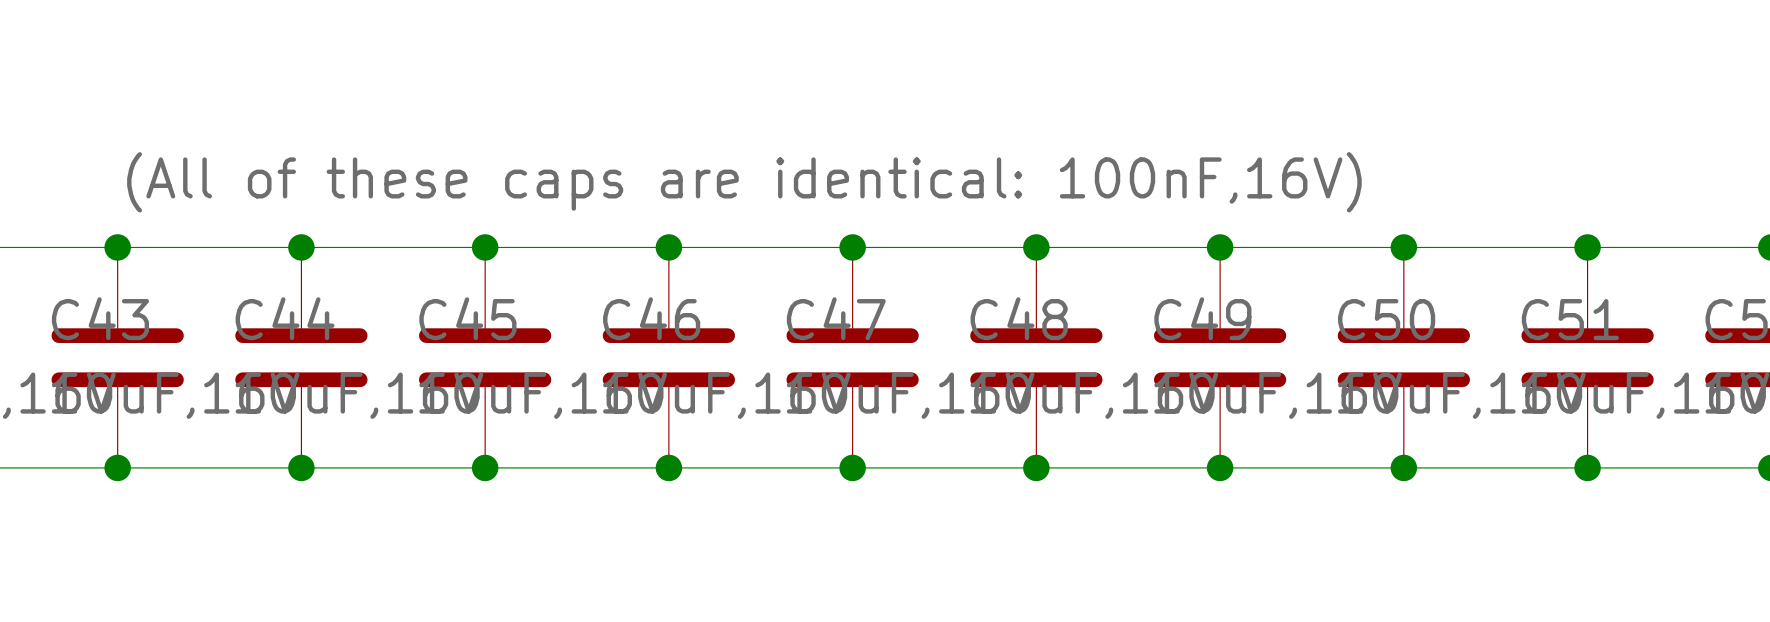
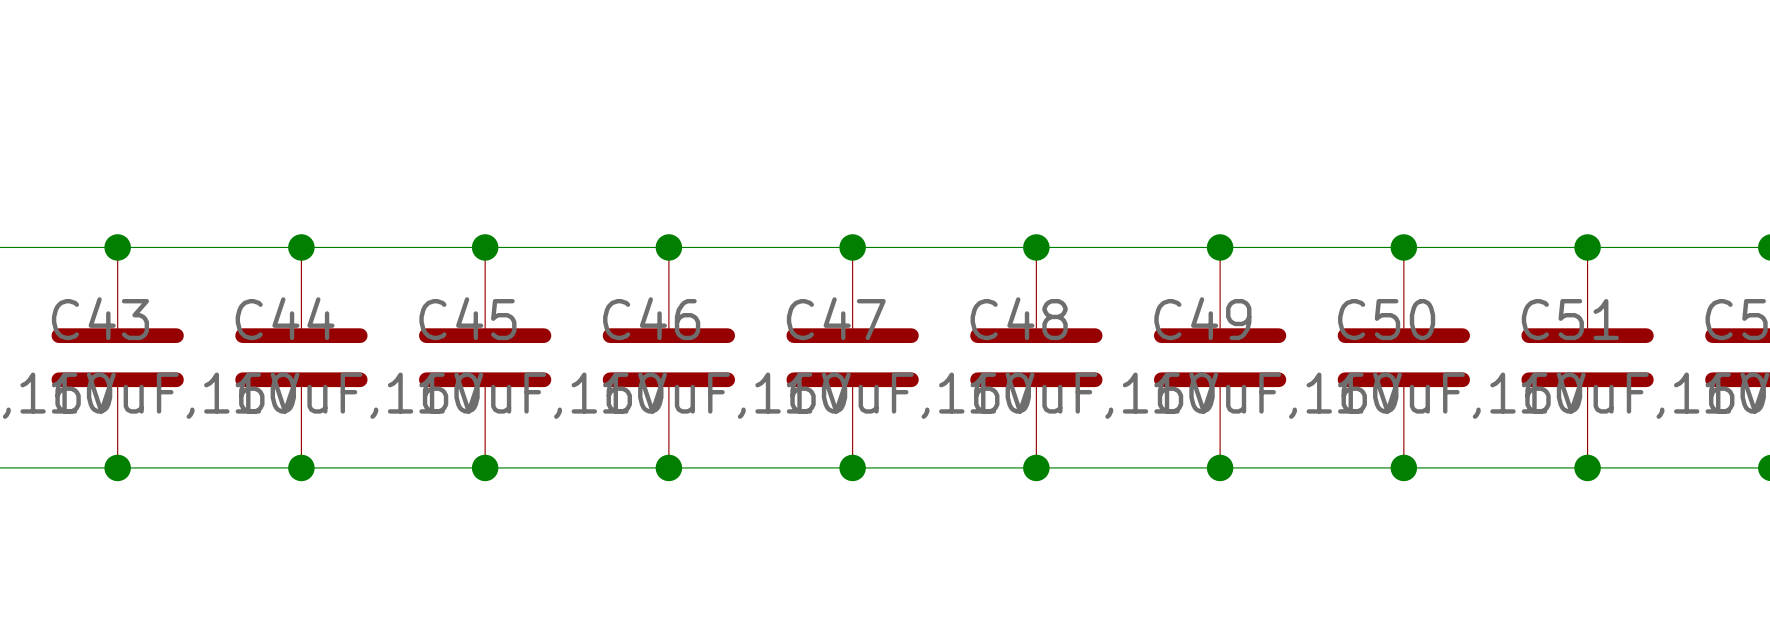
label: (All of these caps are identical: 100nF,16V) (744, 182) -> none

